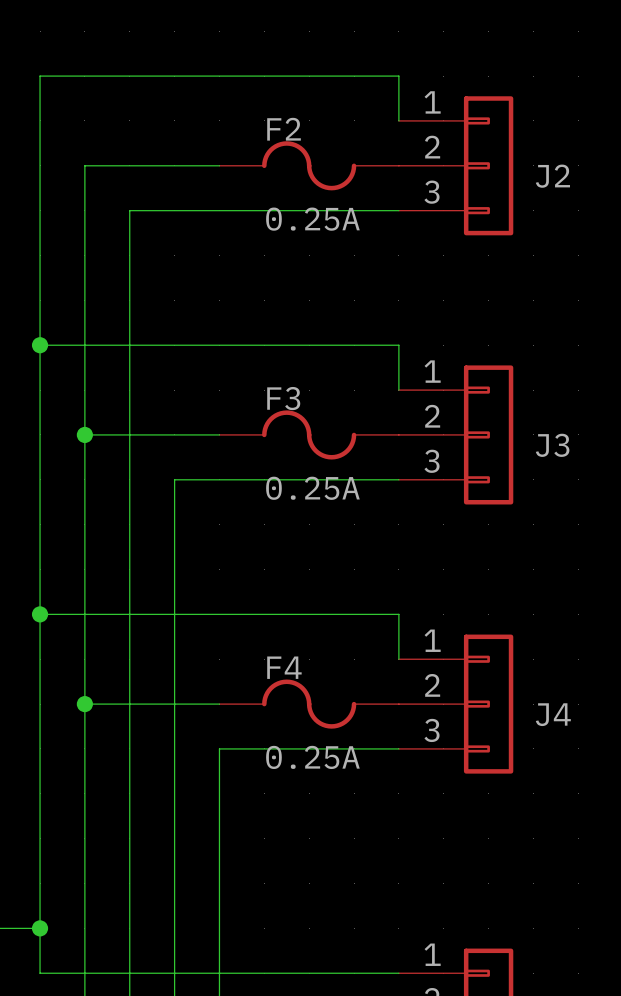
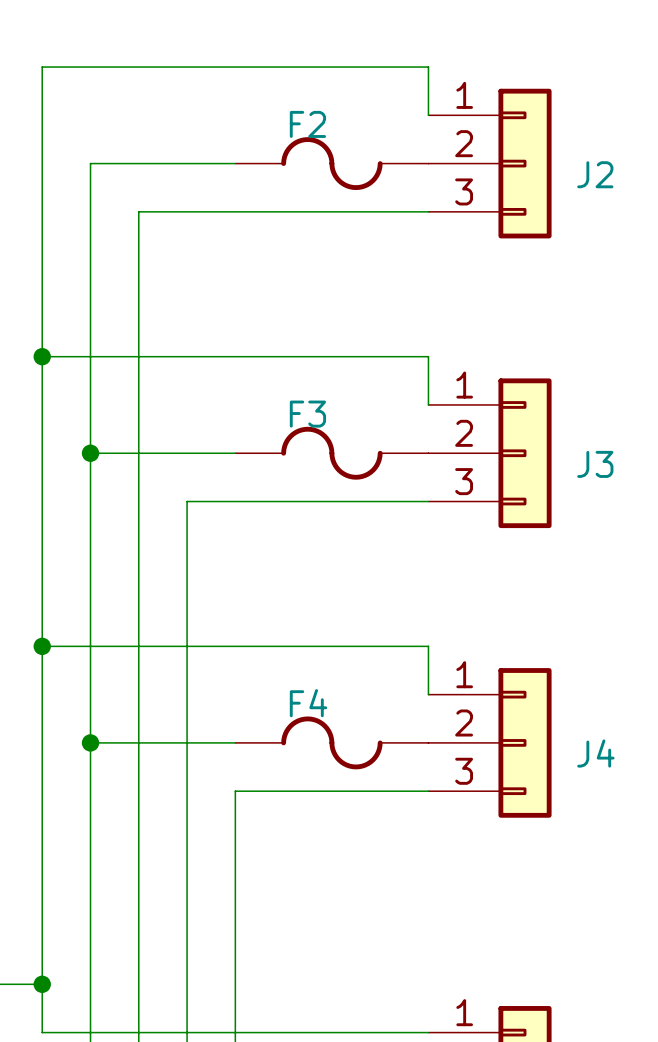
F2 value: 0.25A (312, 219) -> none
F3 value: 0.25A (312, 488) -> none
F4 value: 0.25A (312, 757) -> none

